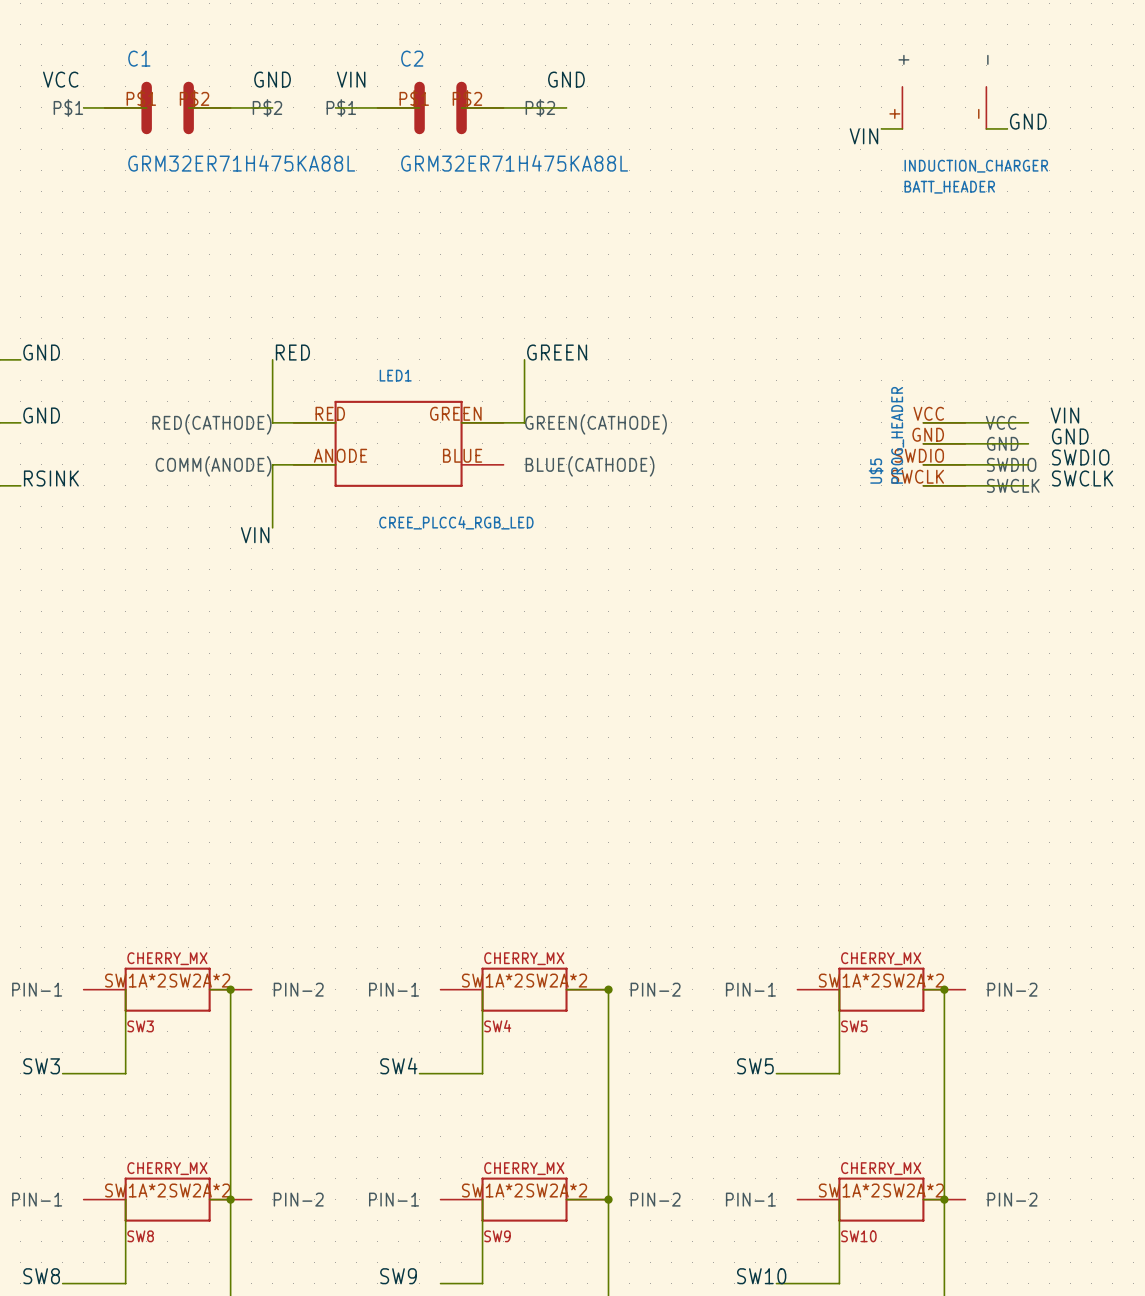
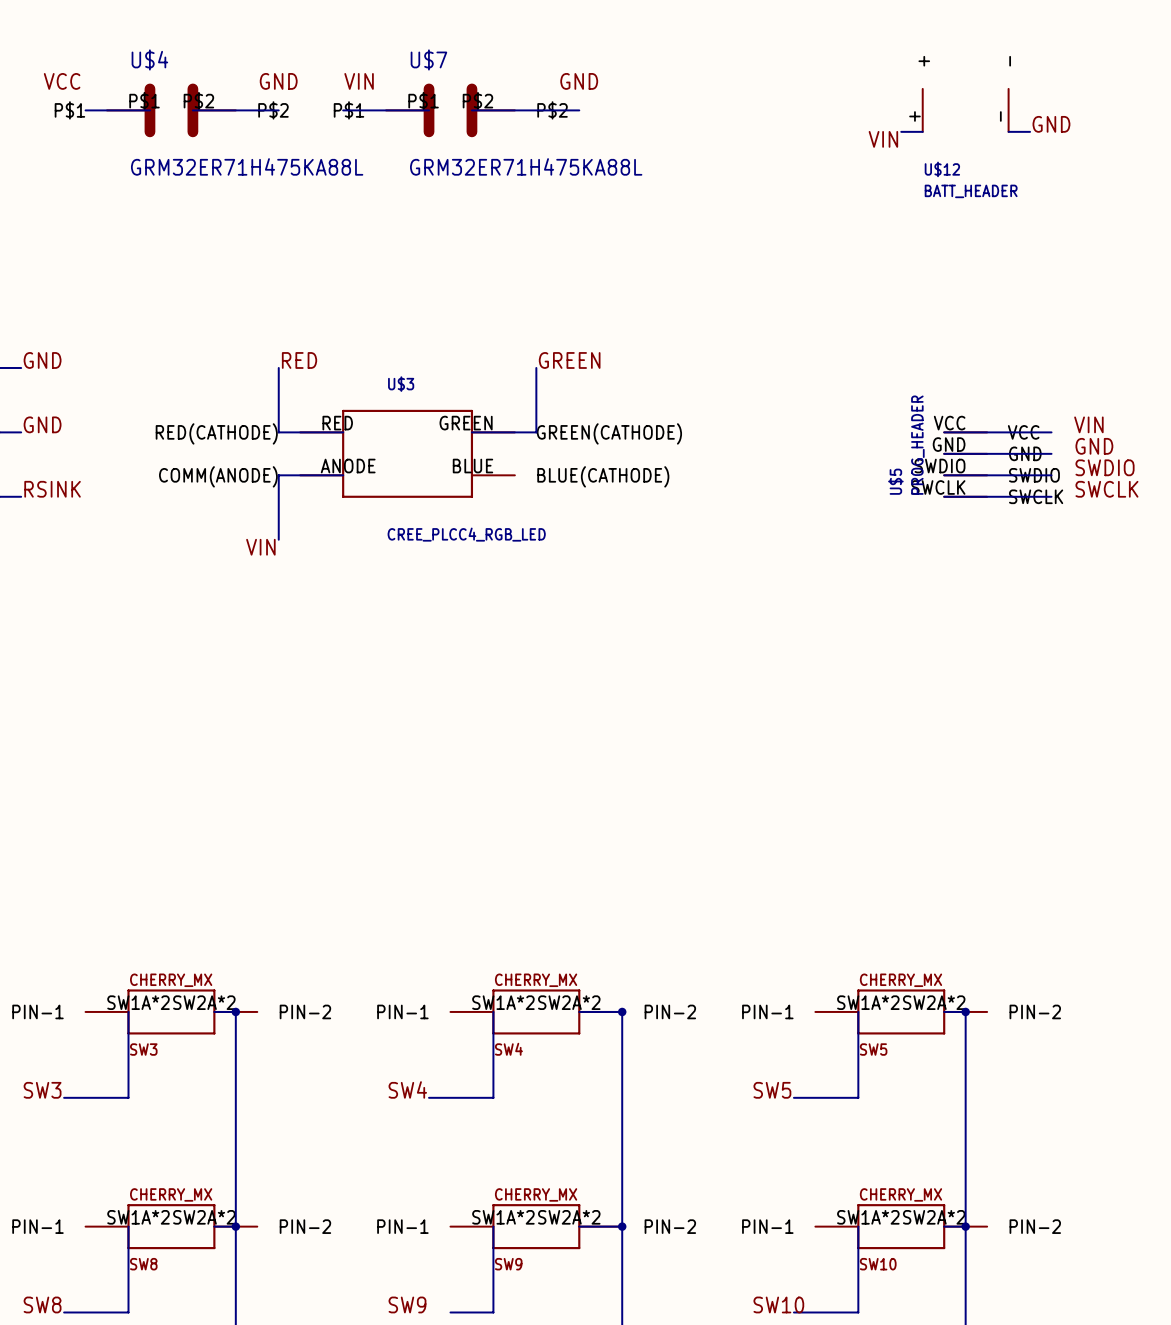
C1 name: C1 (139, 58) -> U$4 (149, 59)
C2 name: C2 (412, 58) -> U$7 (428, 59)
INDUCTION_CHARGER name: INDUCTION_CHARGER (976, 166) -> U$12 (942, 169)
LED1 name: LED1 (395, 375) -> U$3 (401, 384)

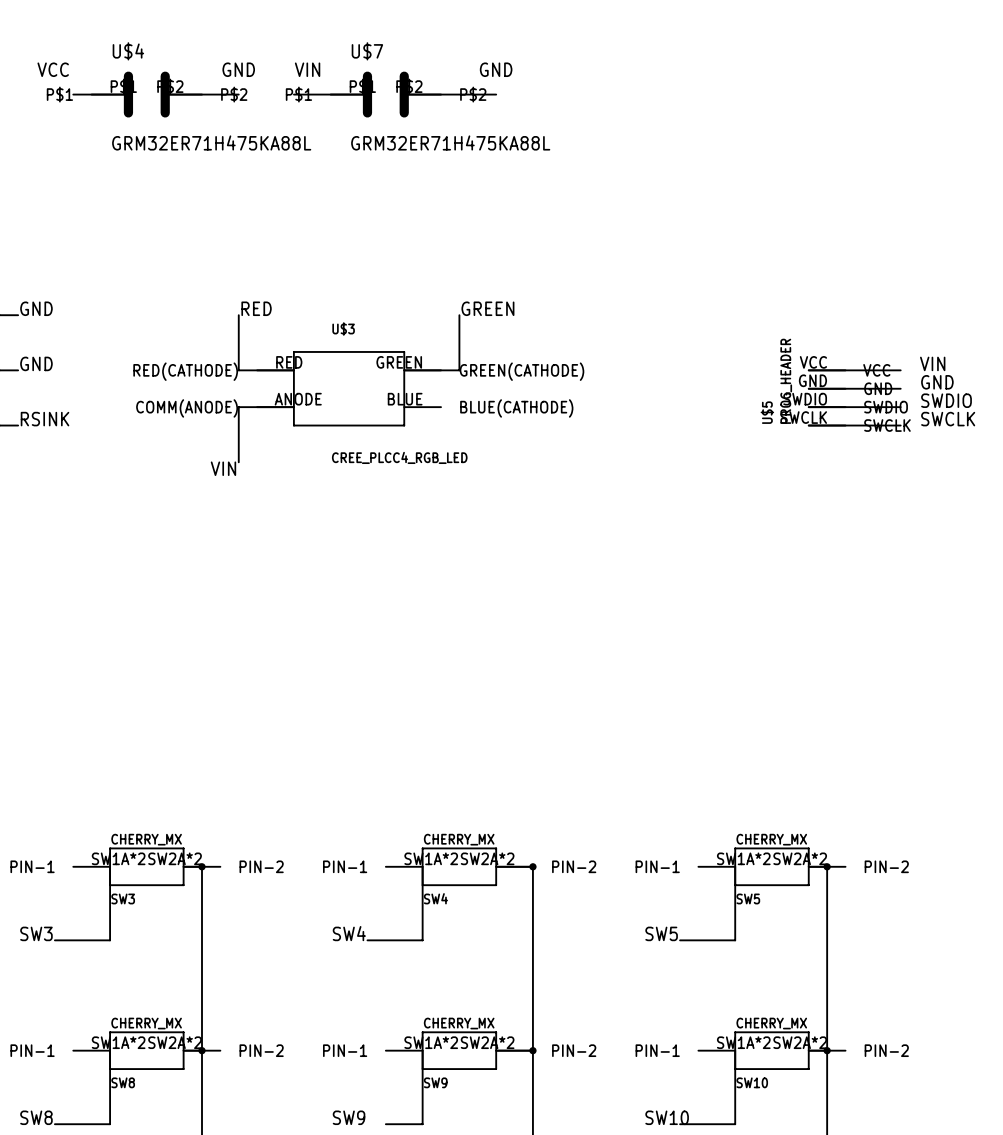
U$12: BATT_HEADER (965, 110) -> none
label: GND (1051, 124) -> none
wire: (901, 131) (922, 131) -> none
wire: (1008, 131) (1030, 131) -> none
label: VIN (883, 139) -> none

